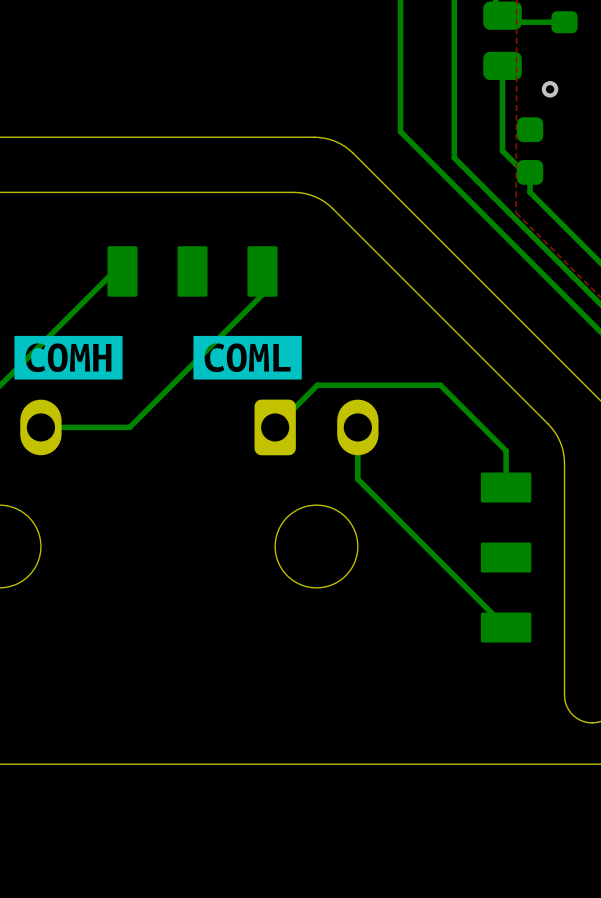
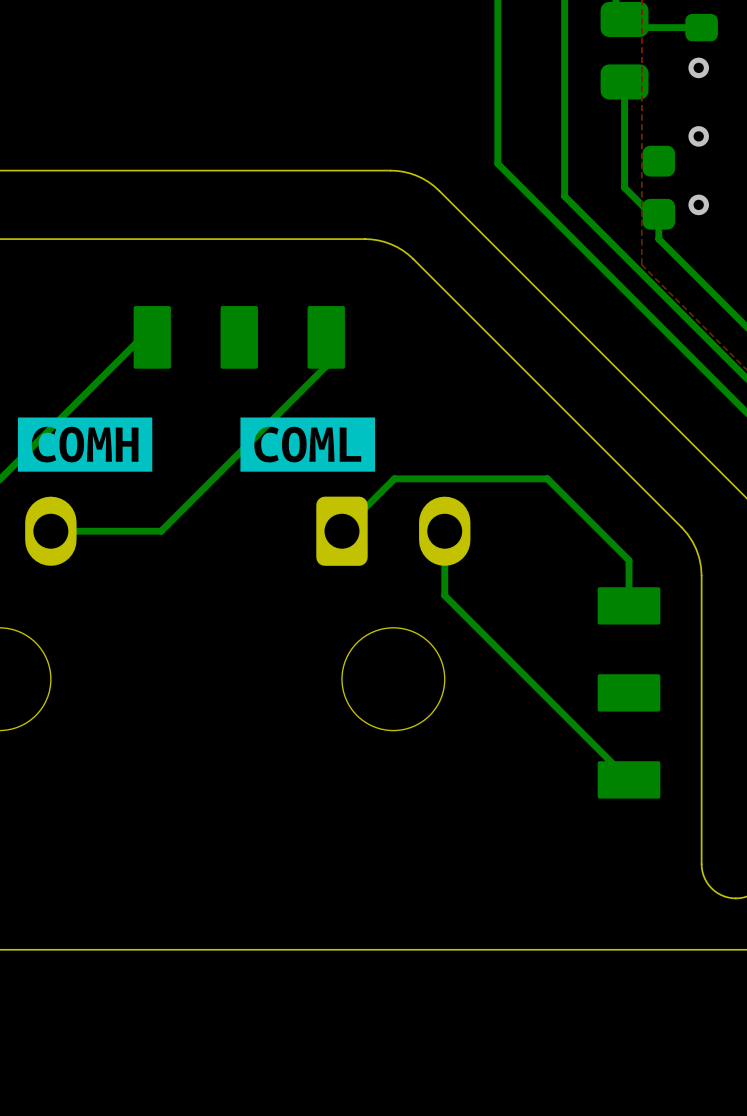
via: none -> (698, 67)
via: (550, 89) -> none
via: none -> (698, 136)
via: none -> (698, 204)

